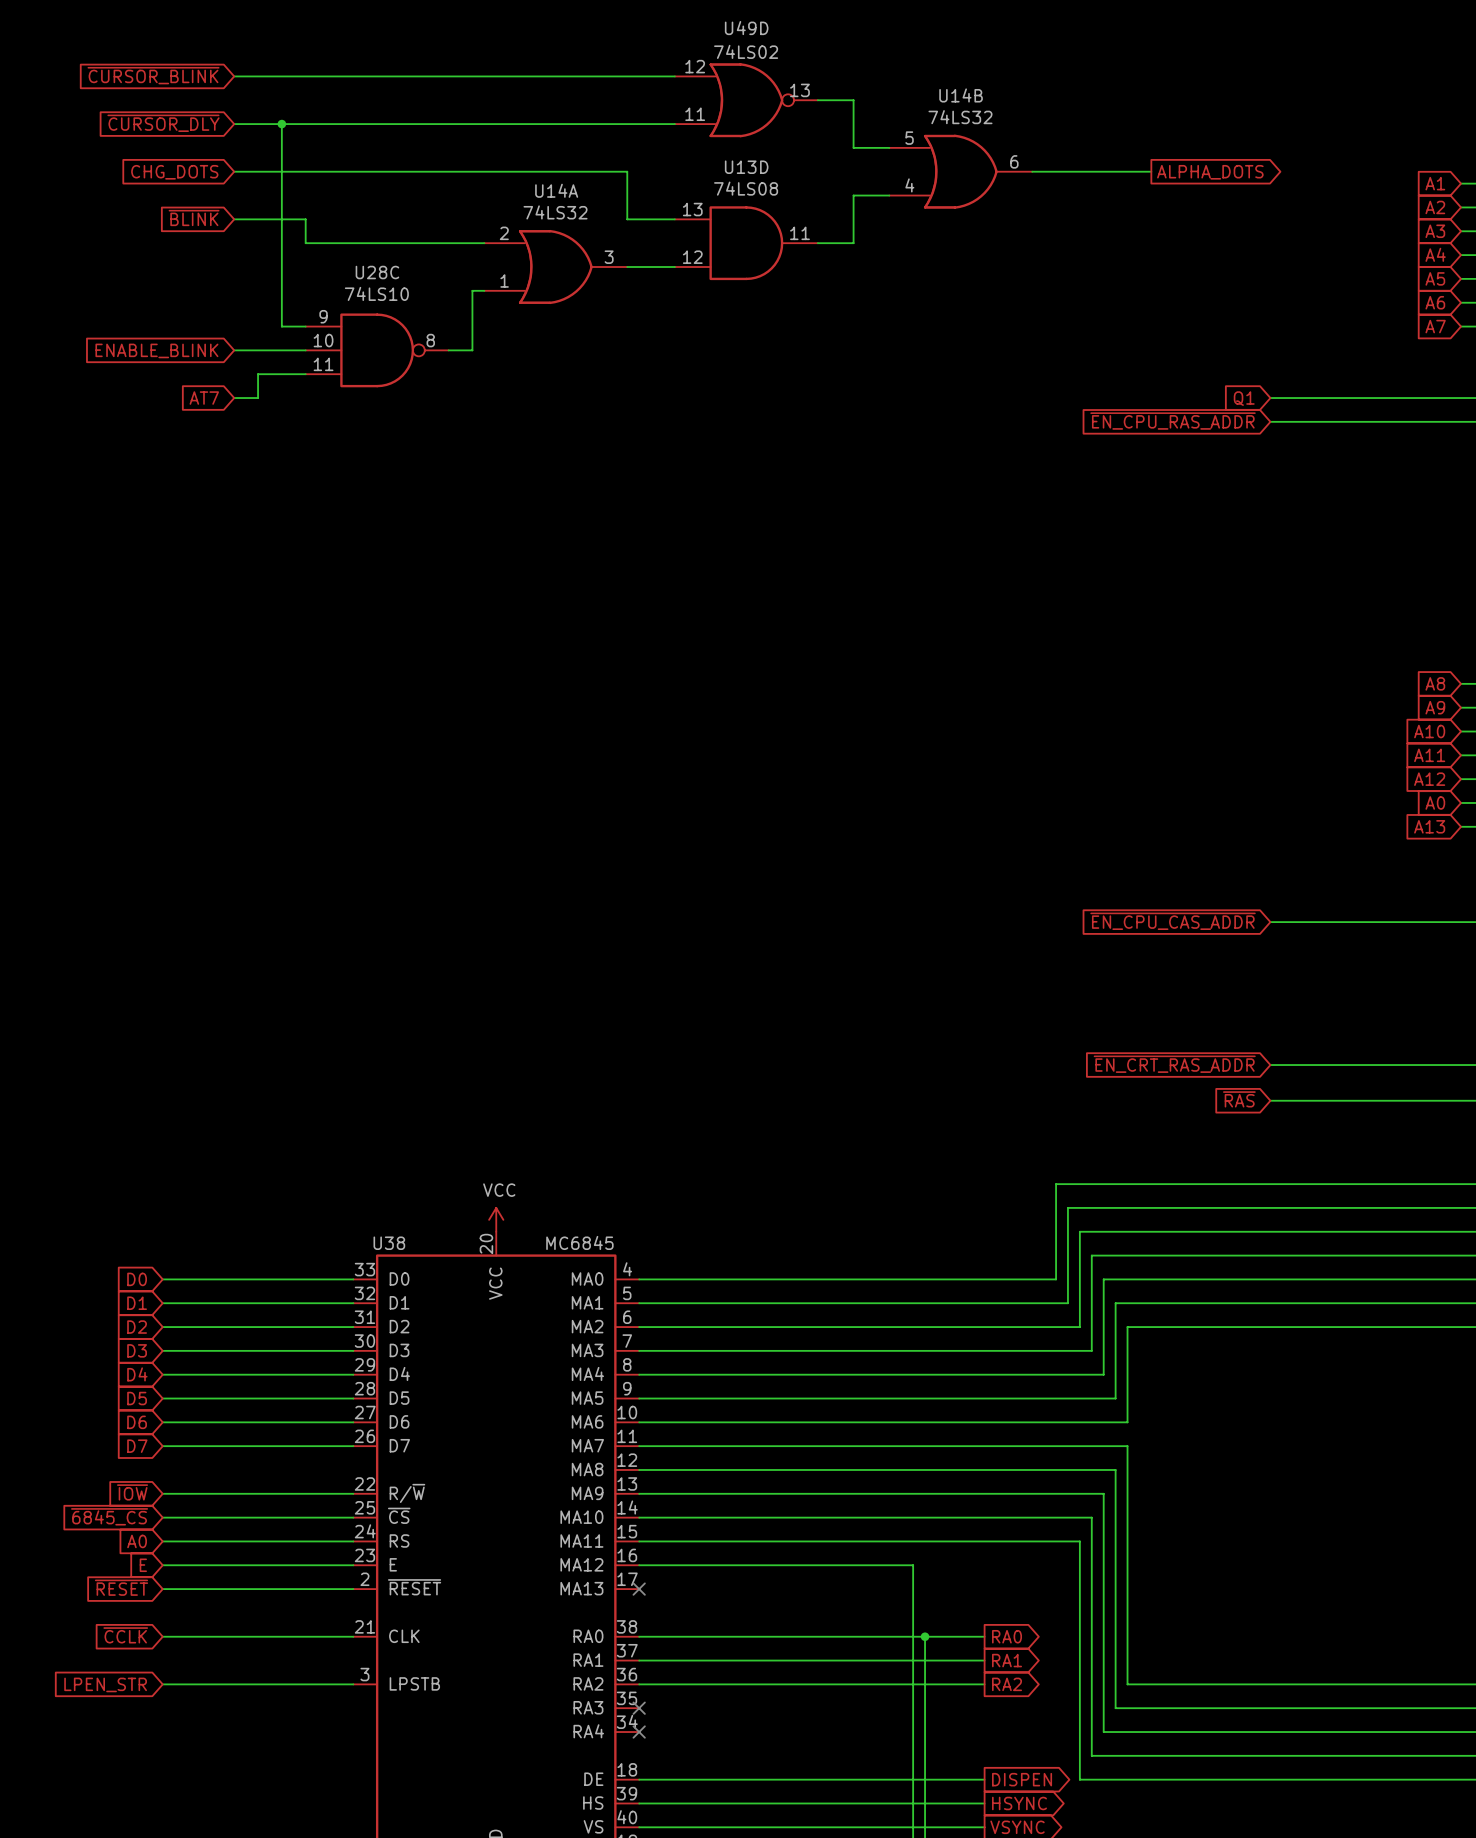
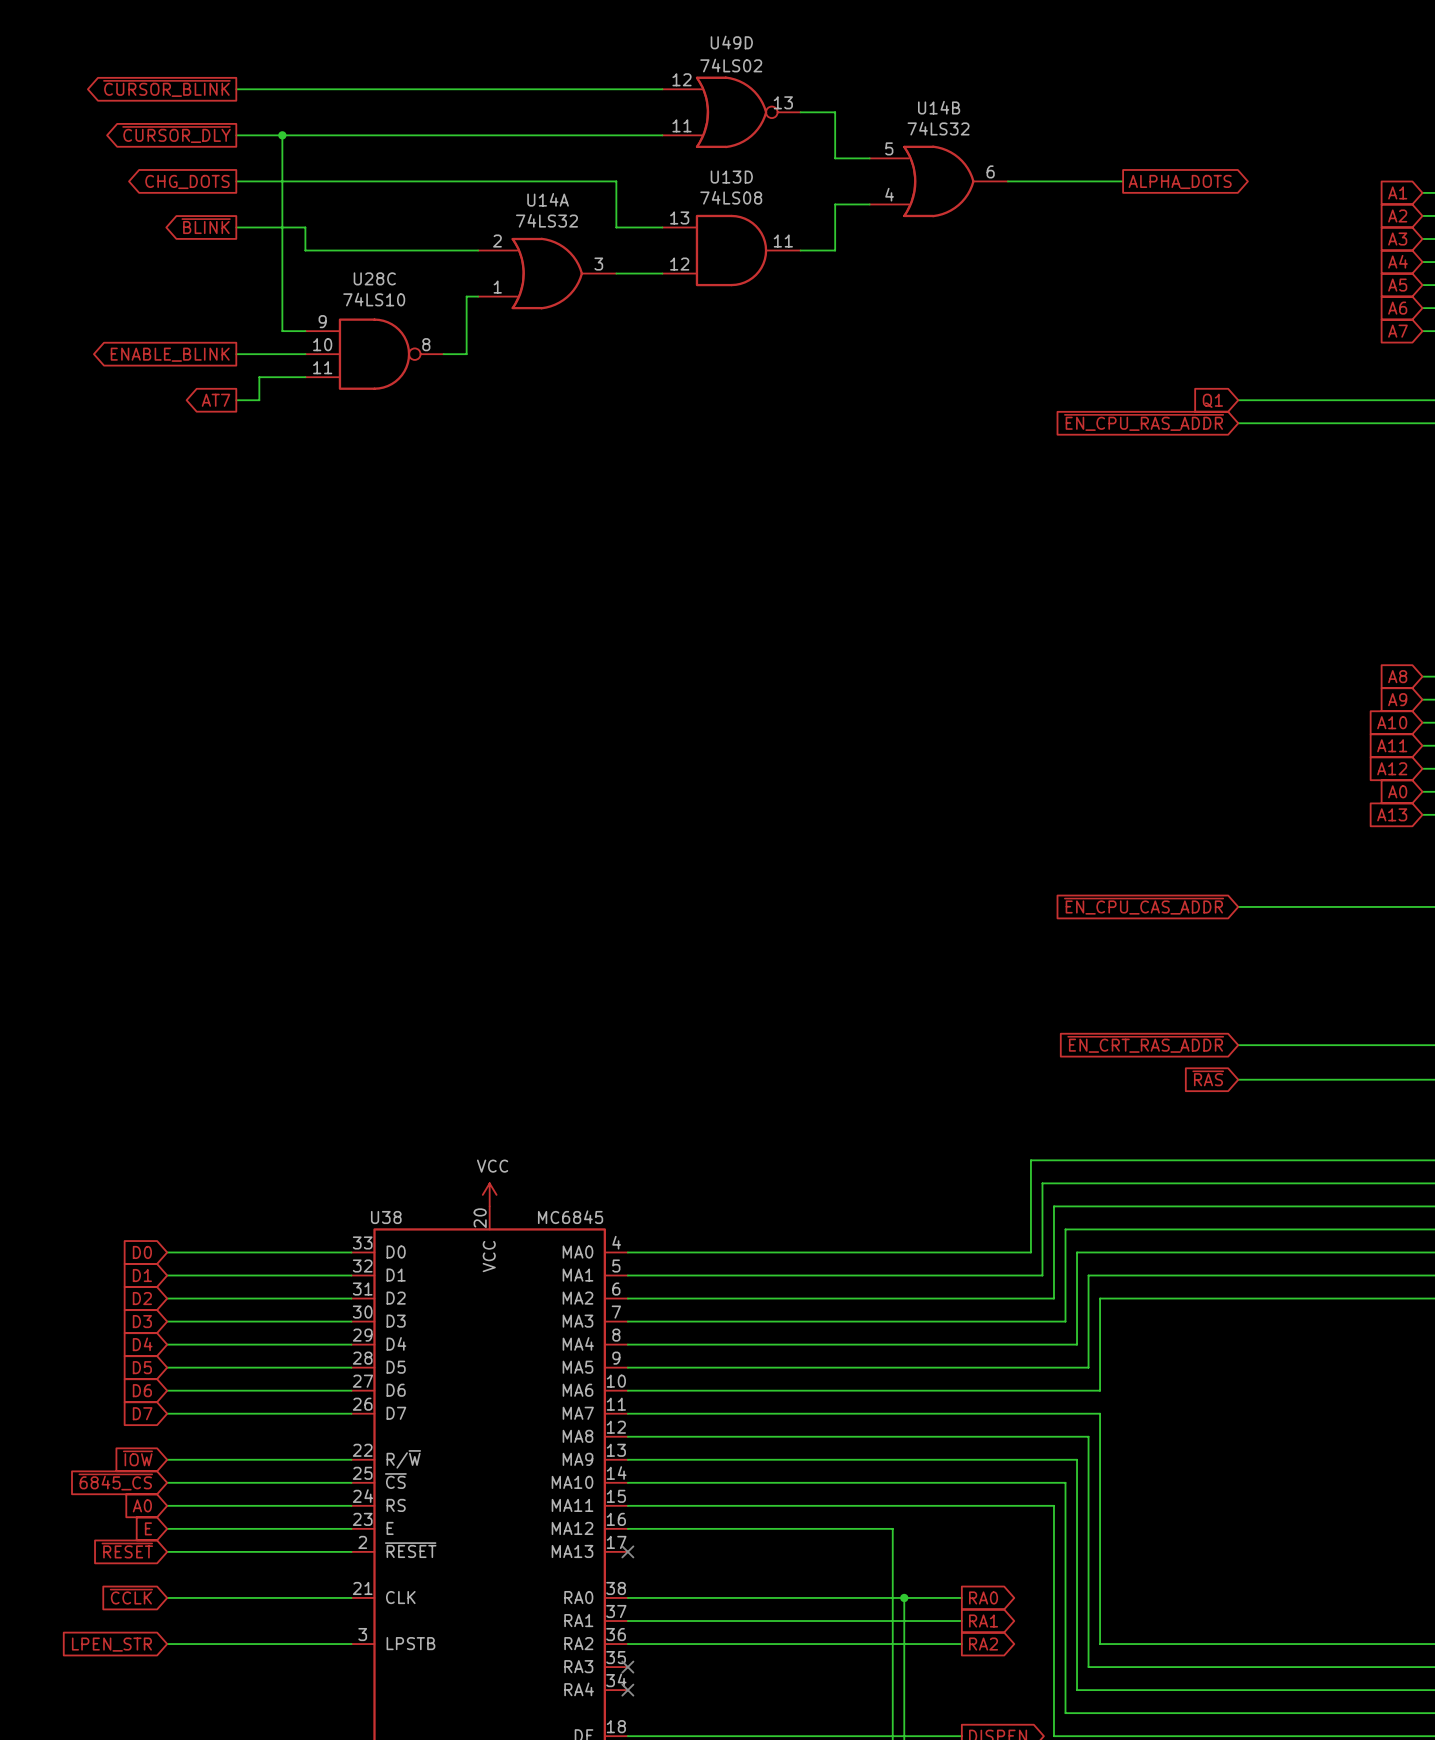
global label shape: input (153, 75) -> output (166, 88)
global label shape: input (163, 123) -> output (176, 134)
global label shape: input (174, 172) -> output (187, 181)
global label shape: input (194, 217) -> output (206, 226)
global label shape: input (156, 350) -> output (170, 354)
global label shape: input (204, 398) -> output (215, 400)

